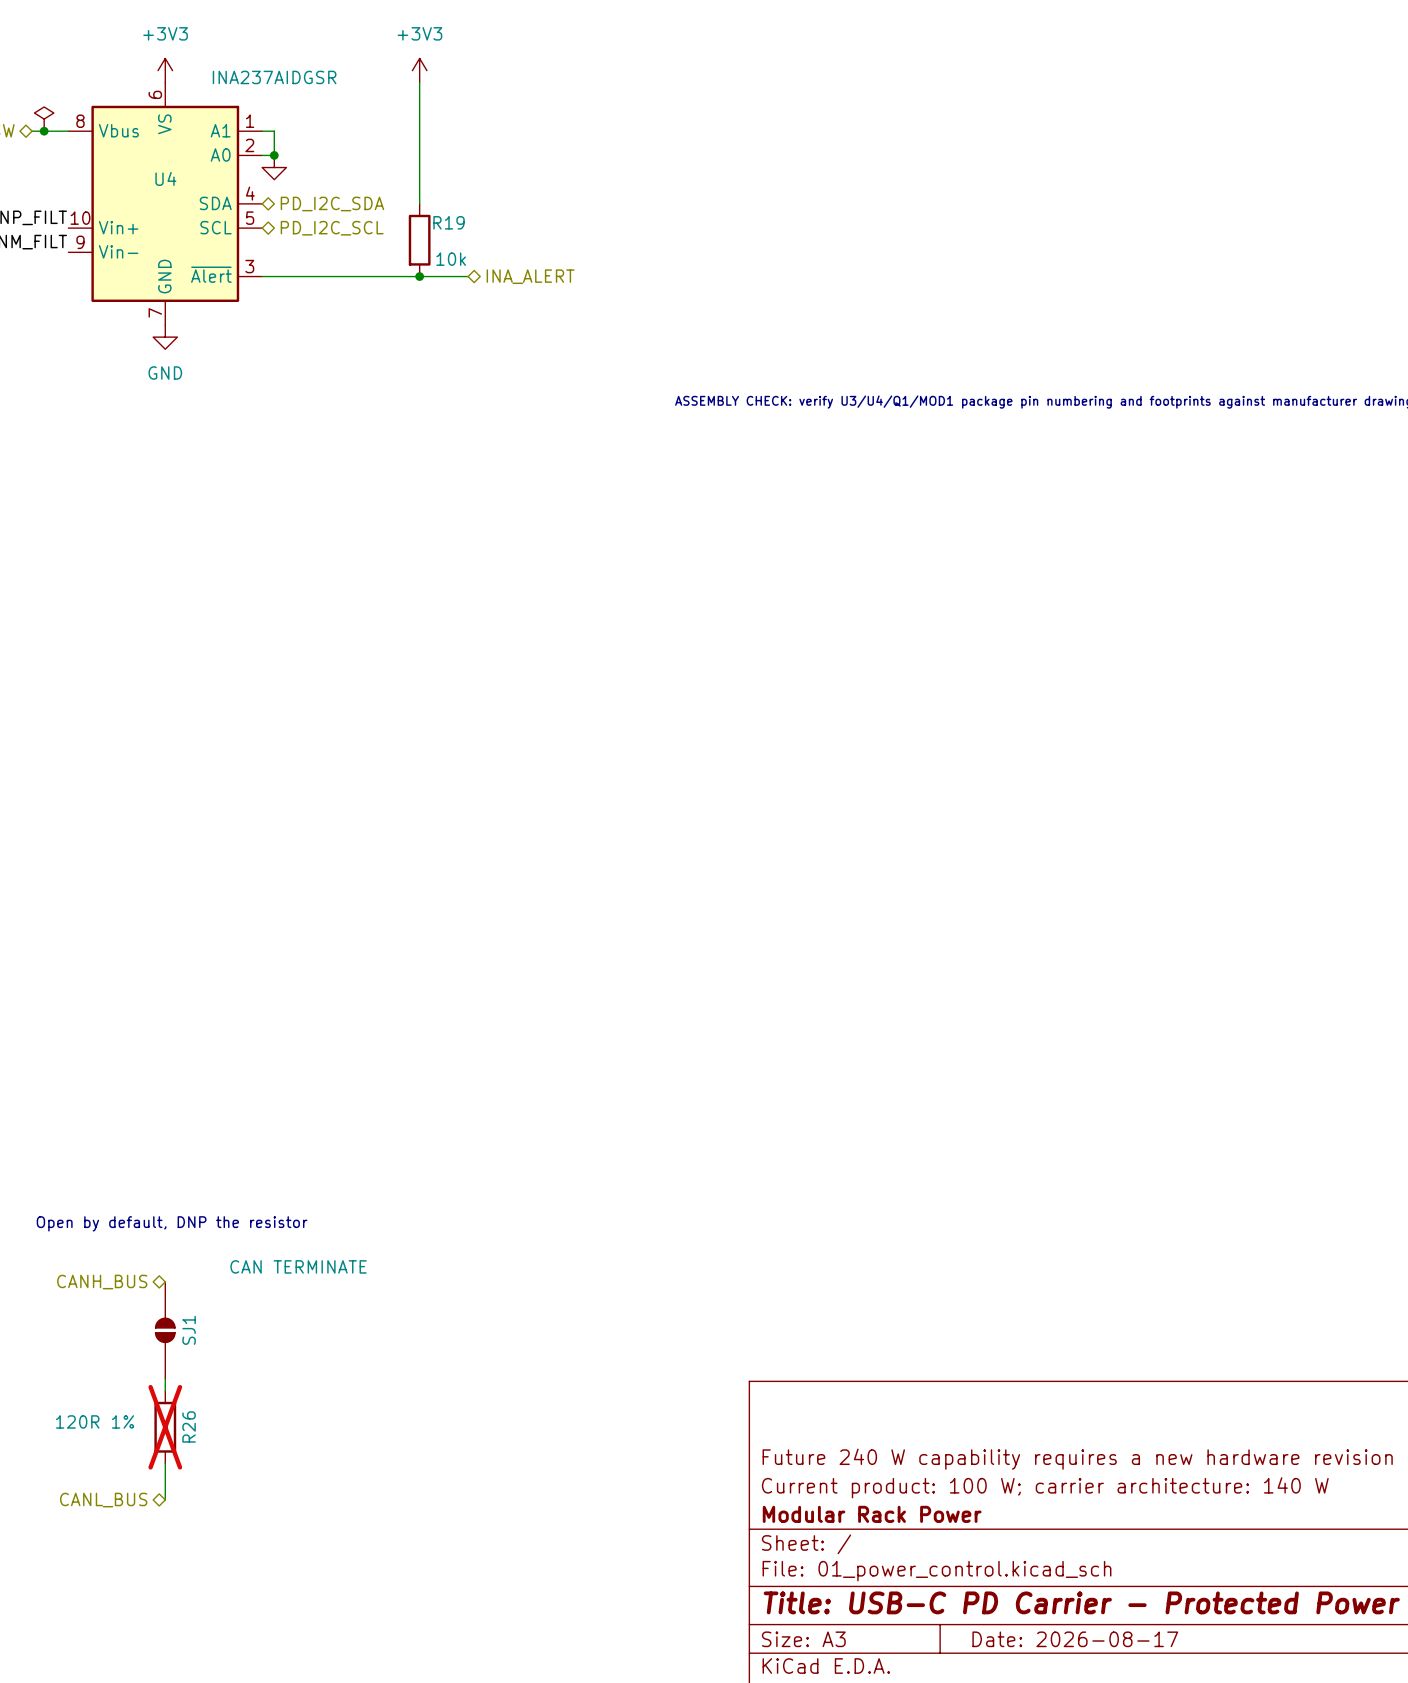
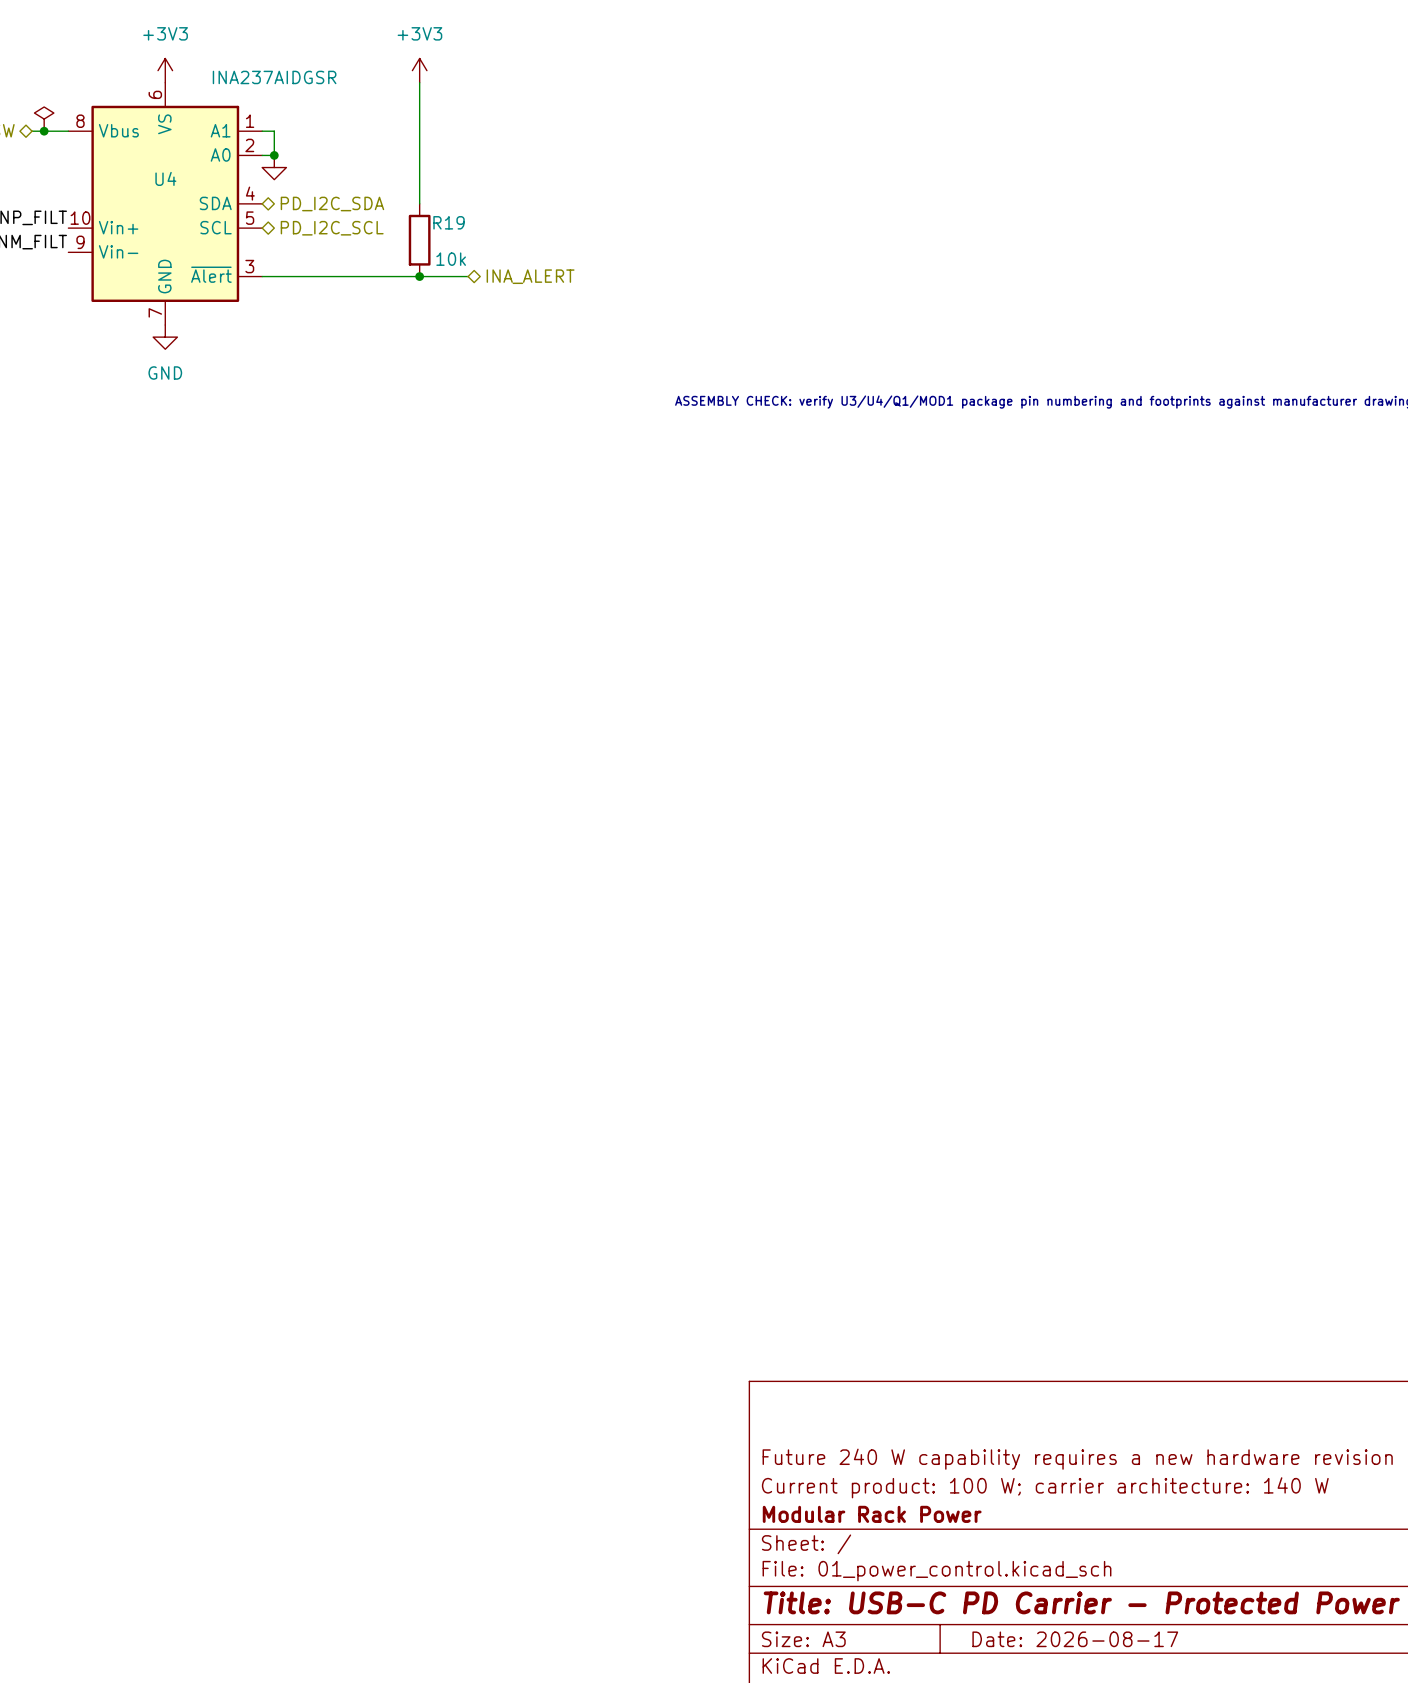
text: Open by default, DNP the resistor (172, 1223) -> none
hierarchical label: CANH_BUS (102, 1282) -> none
SJ1: CAN TERMINATE (165, 1330) -> none
wire: (165, 1378) (165, 1390) -> none
R26: 120R 1% (165, 1427) -> none
wire: (165, 1463) (165, 1499) -> none
hierarchical label: CANL_BUS (103, 1500) -> none

